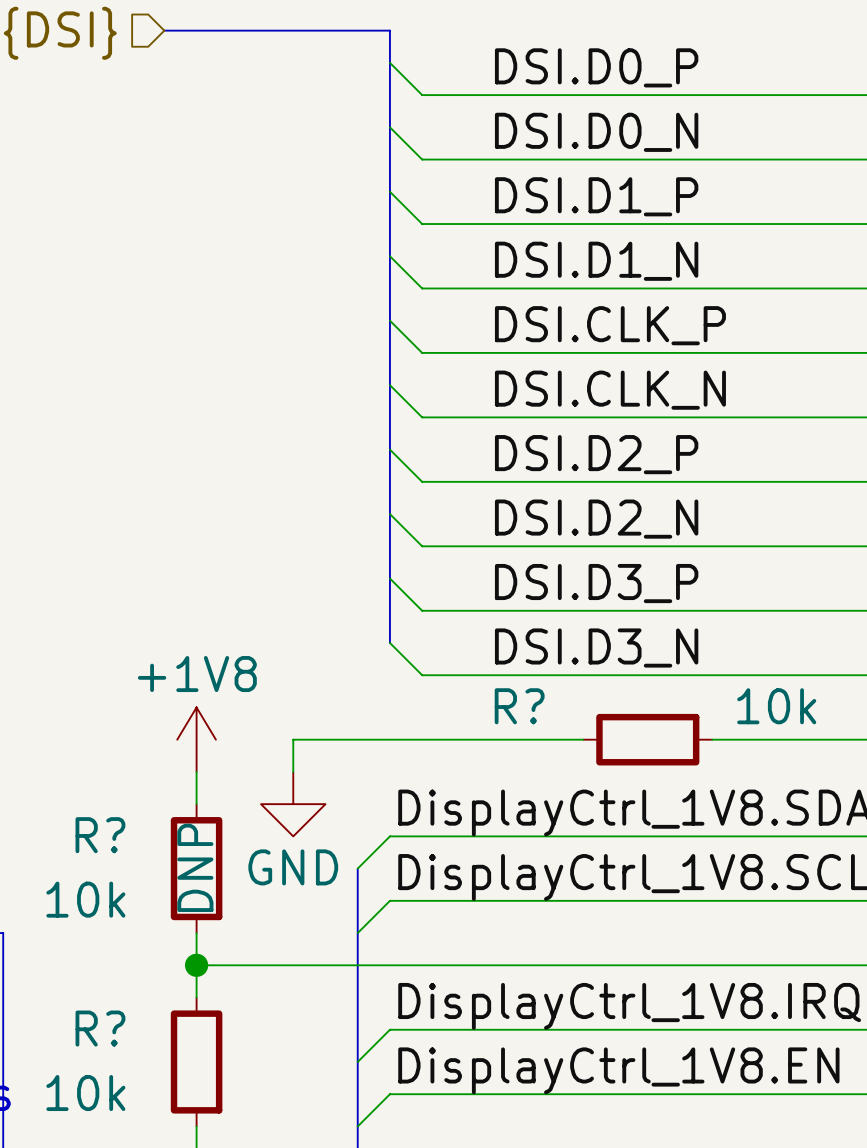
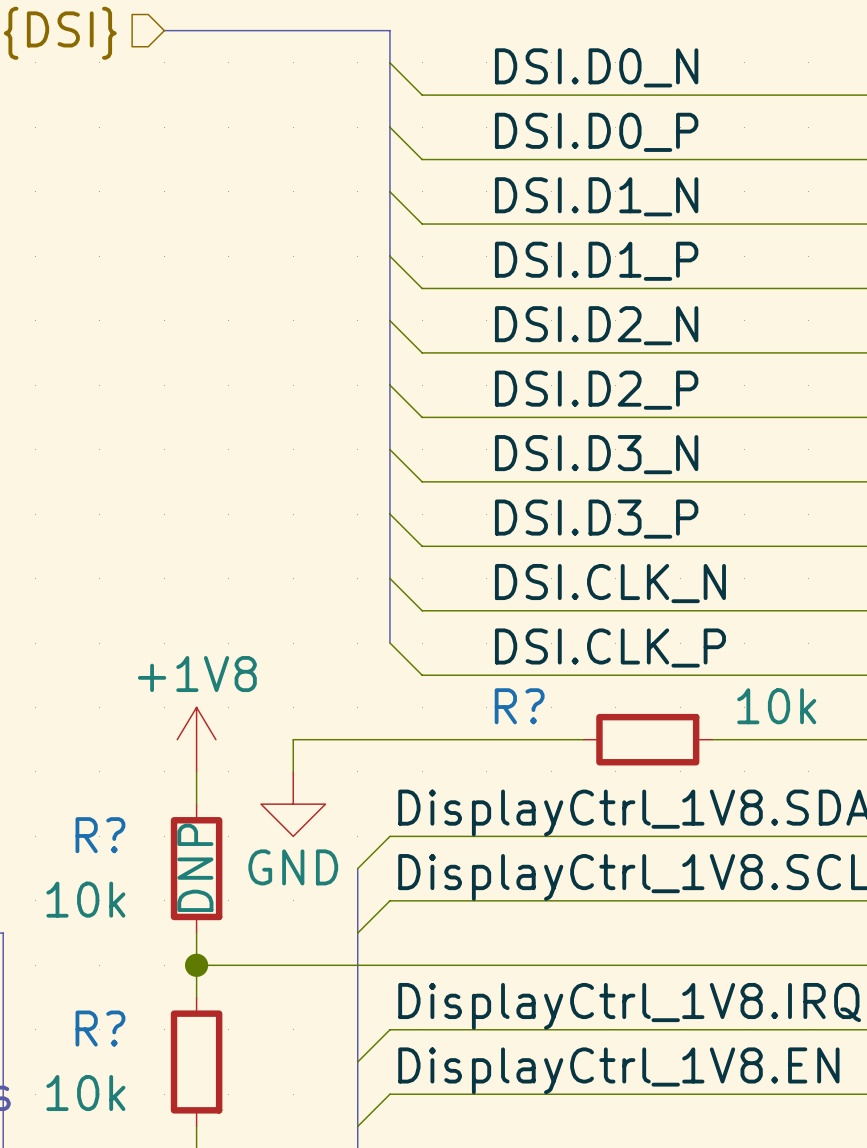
label: DSI.D0_P (596, 67) -> DSI.D0_N (596, 67)
label: DSI.D0_N (596, 132) -> DSI.D0_P (596, 132)
label: DSI.D1_P (596, 196) -> DSI.D1_N (596, 196)
label: DSI.D1_N (596, 261) -> DSI.D1_P (596, 261)
label: DSI.CLK_P (610, 325) -> DSI.D2_N (596, 325)
label: DSI.CLK_N (610, 390) -> DSI.D2_P (596, 390)
label: DSI.D2_P (596, 454) -> DSI.D3_N (596, 454)
label: DSI.D2_N (596, 519) -> DSI.D3_P (596, 519)
label: DSI.D3_P (596, 583) -> DSI.CLK_N (610, 583)
label: DSI.D3_N (596, 648) -> DSI.CLK_P (610, 648)

